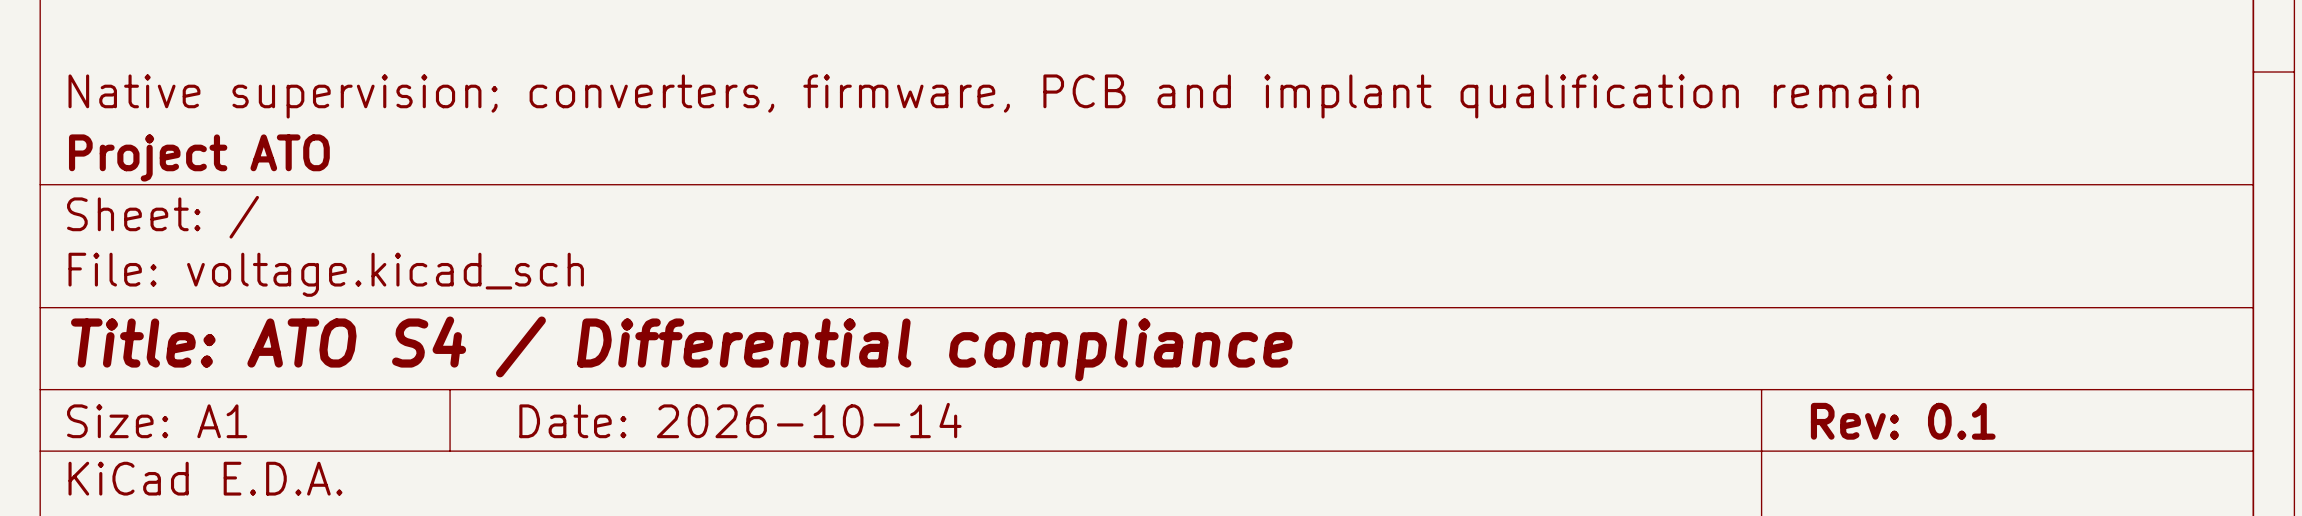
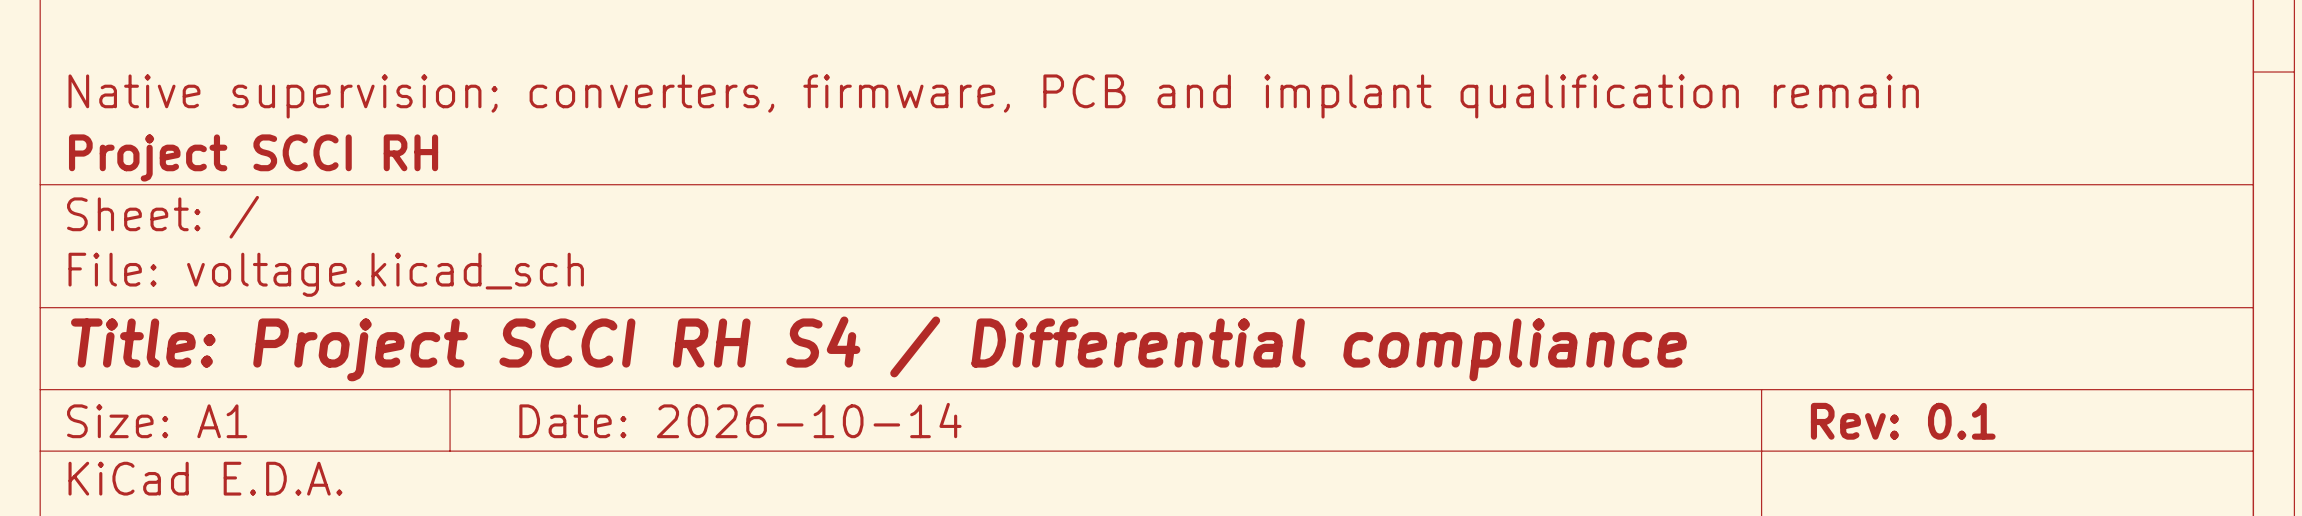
title block: Project ATO (199, 157) -> Project SCCI RH (253, 157)
title block: Title: ATO S4 / Differential compliance (681, 348) -> Title: Project SCCI RH S4 / Differential compliance (878, 348)

